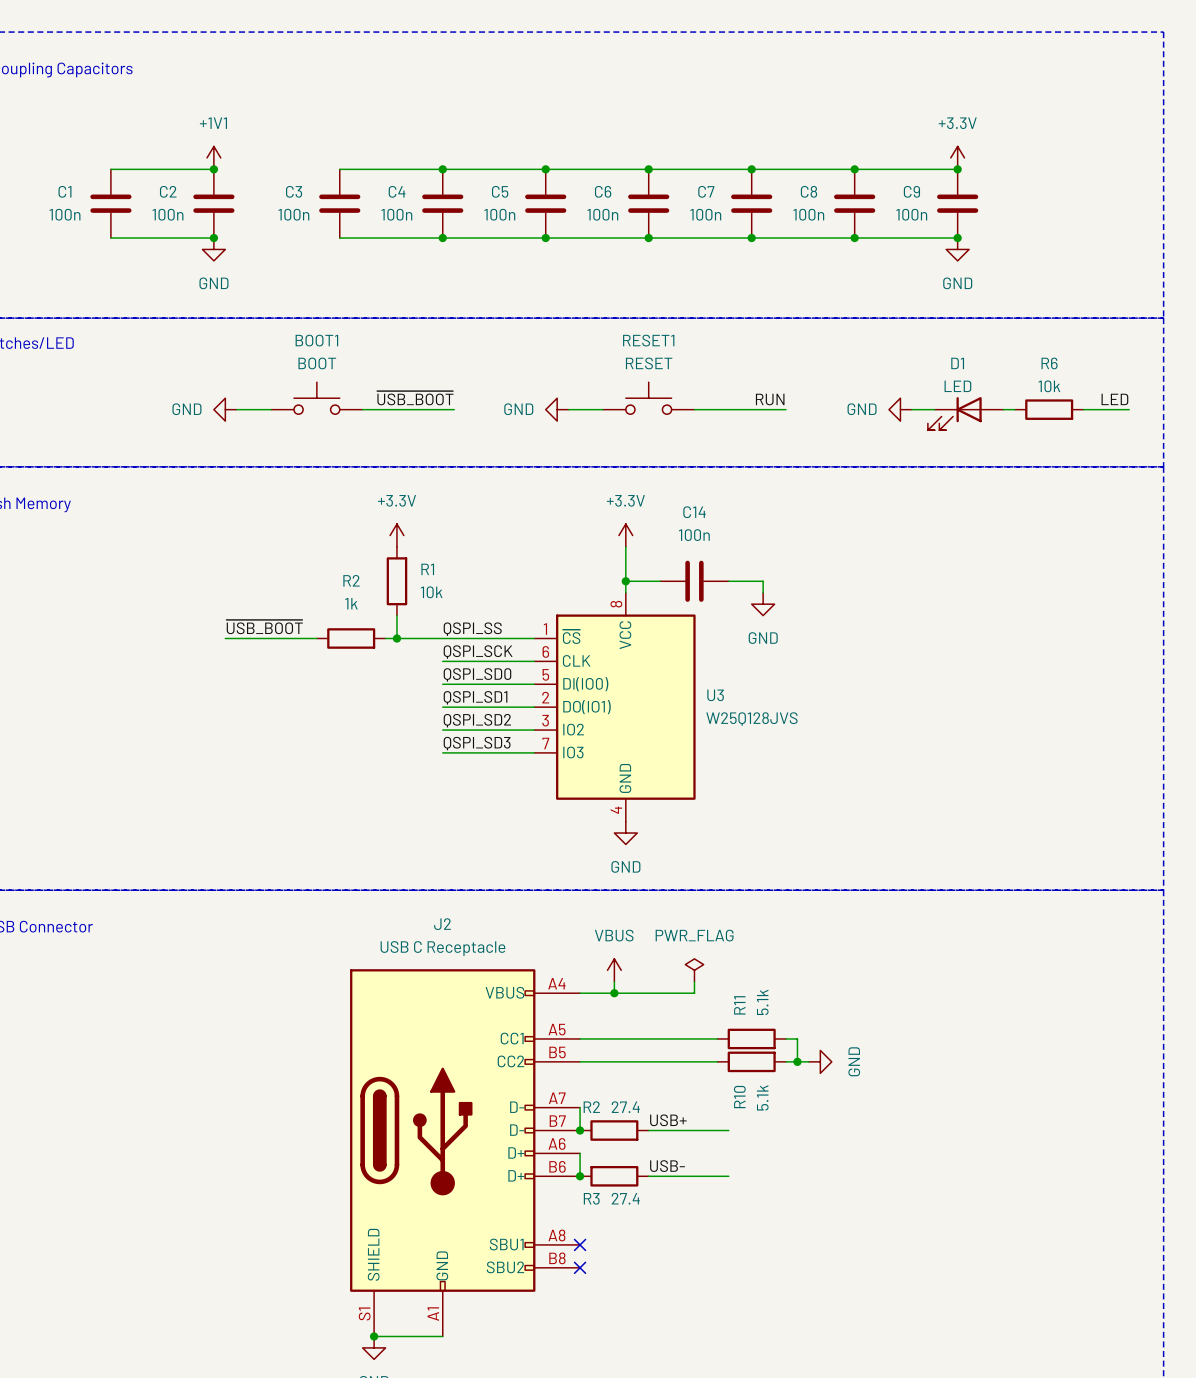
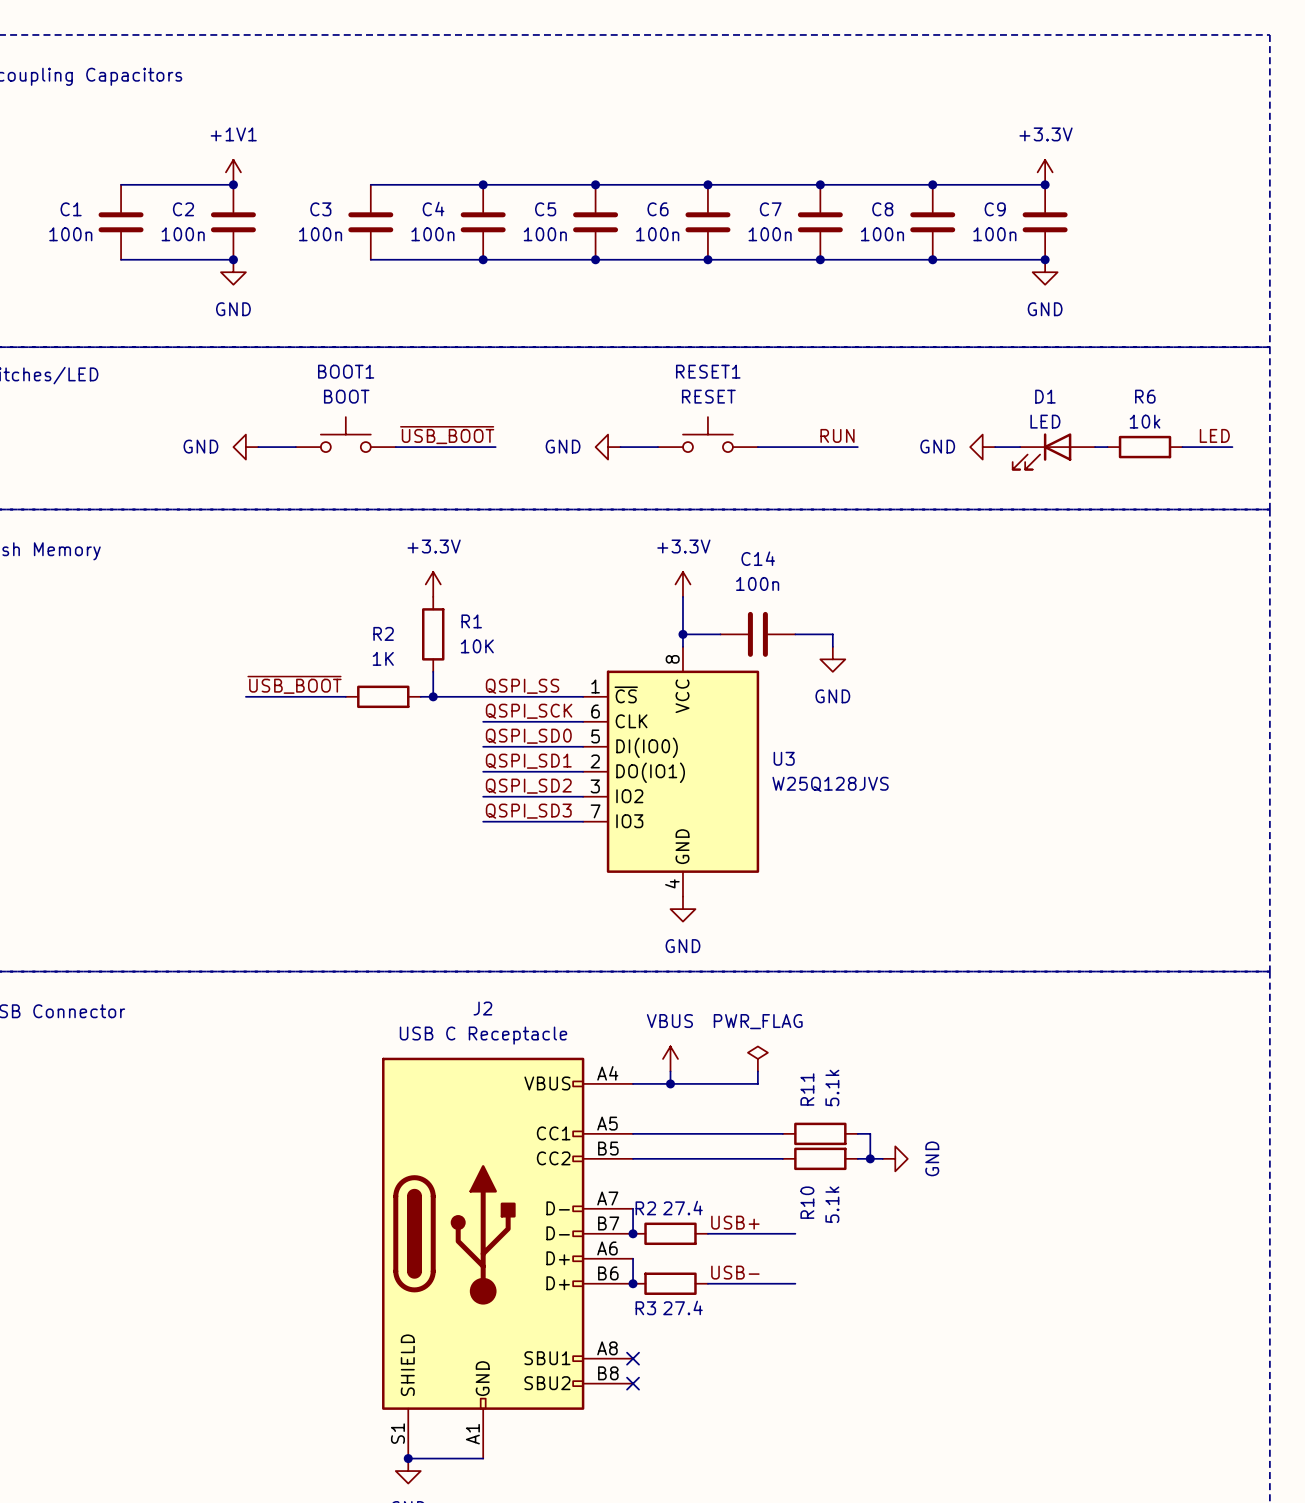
R1 value: 10k (431, 592) -> 10K (477, 646)
R2 value: 1k (351, 603) -> 1K (383, 658)

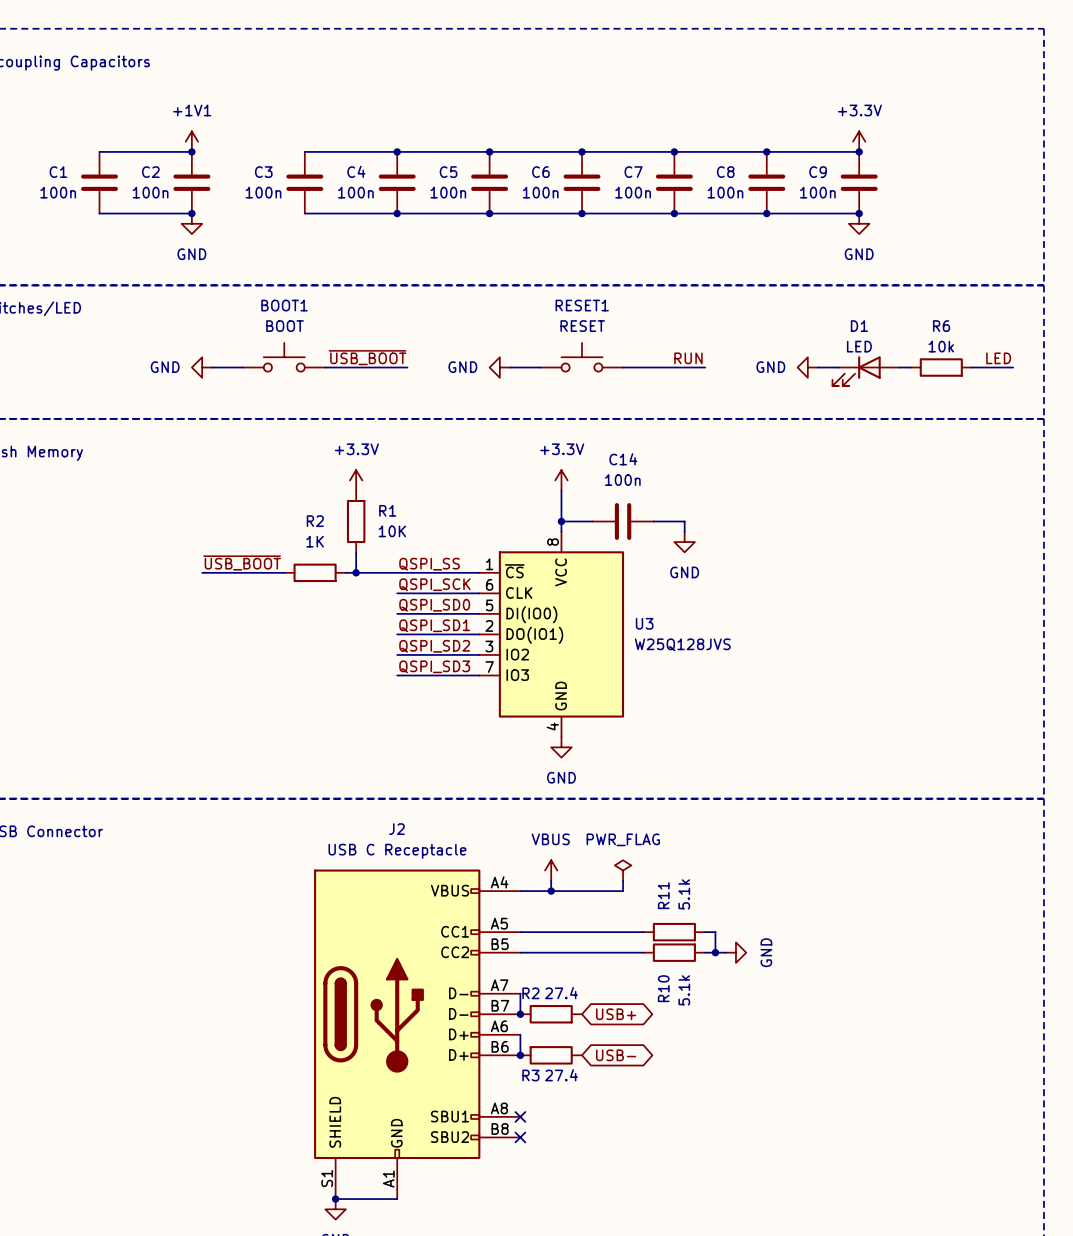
label: USB+ (735, 1222) -> none
wire: (707, 1233) (795, 1233) -> none
global label: none -> USB+ (616, 1014)
label: USB- (735, 1272) -> none
wire: (707, 1283) (795, 1283) -> none
global label: none -> USB- (616, 1055)

